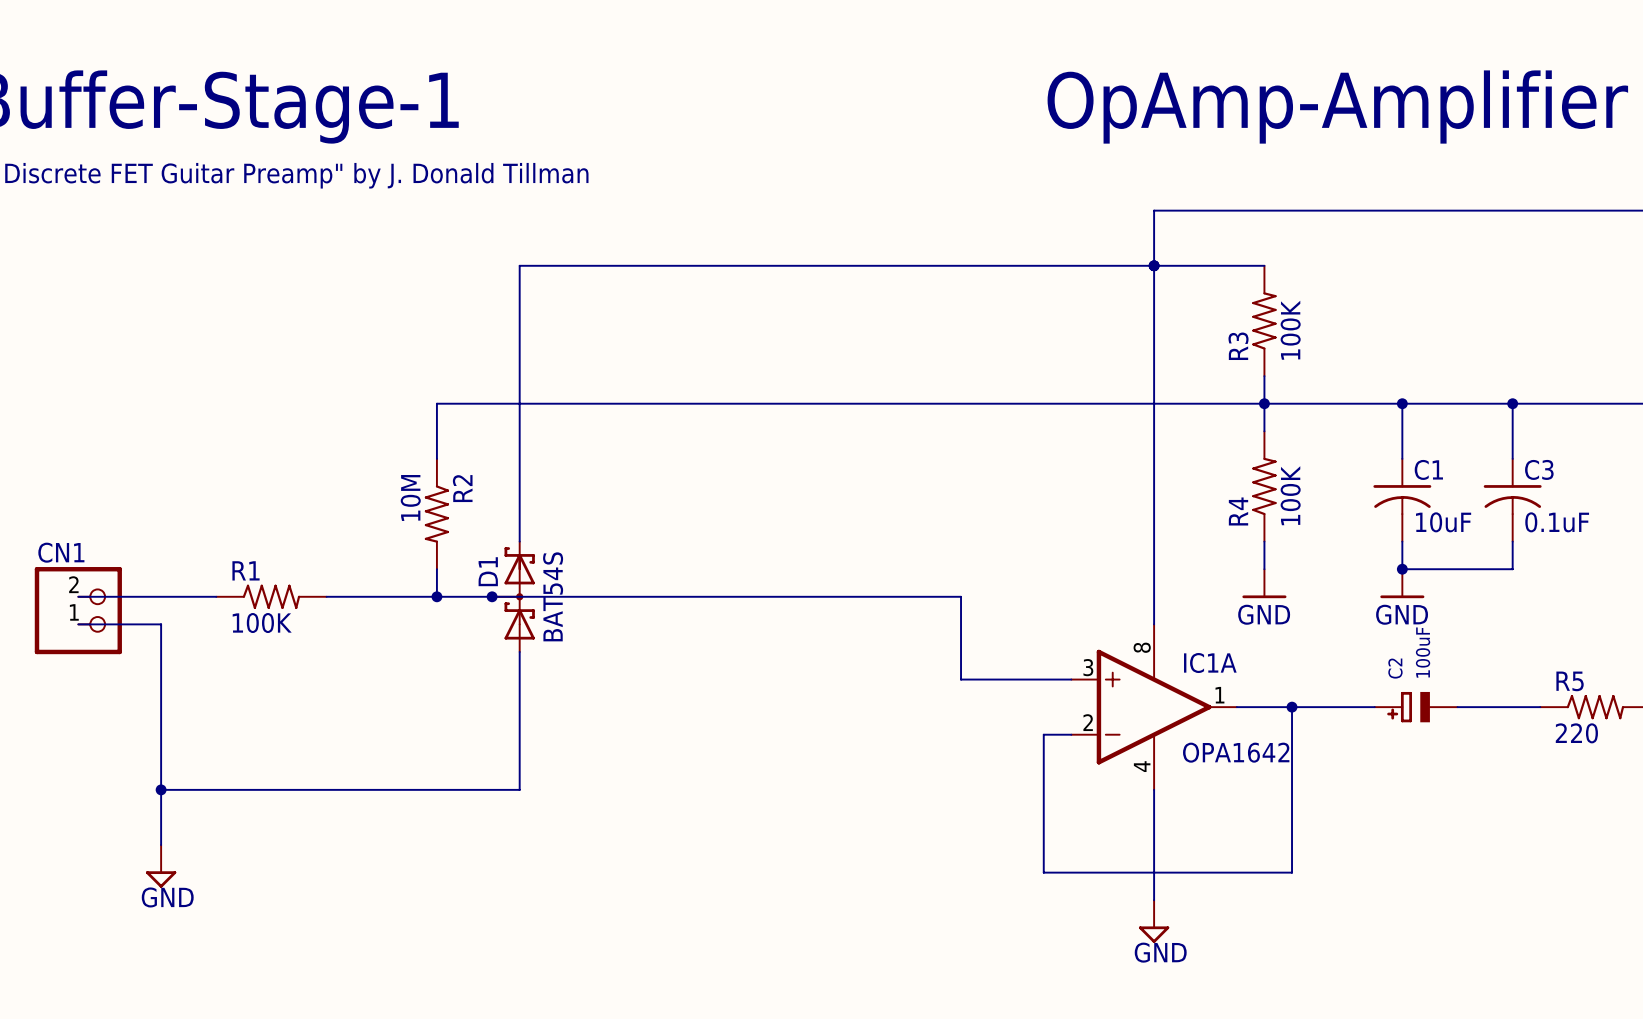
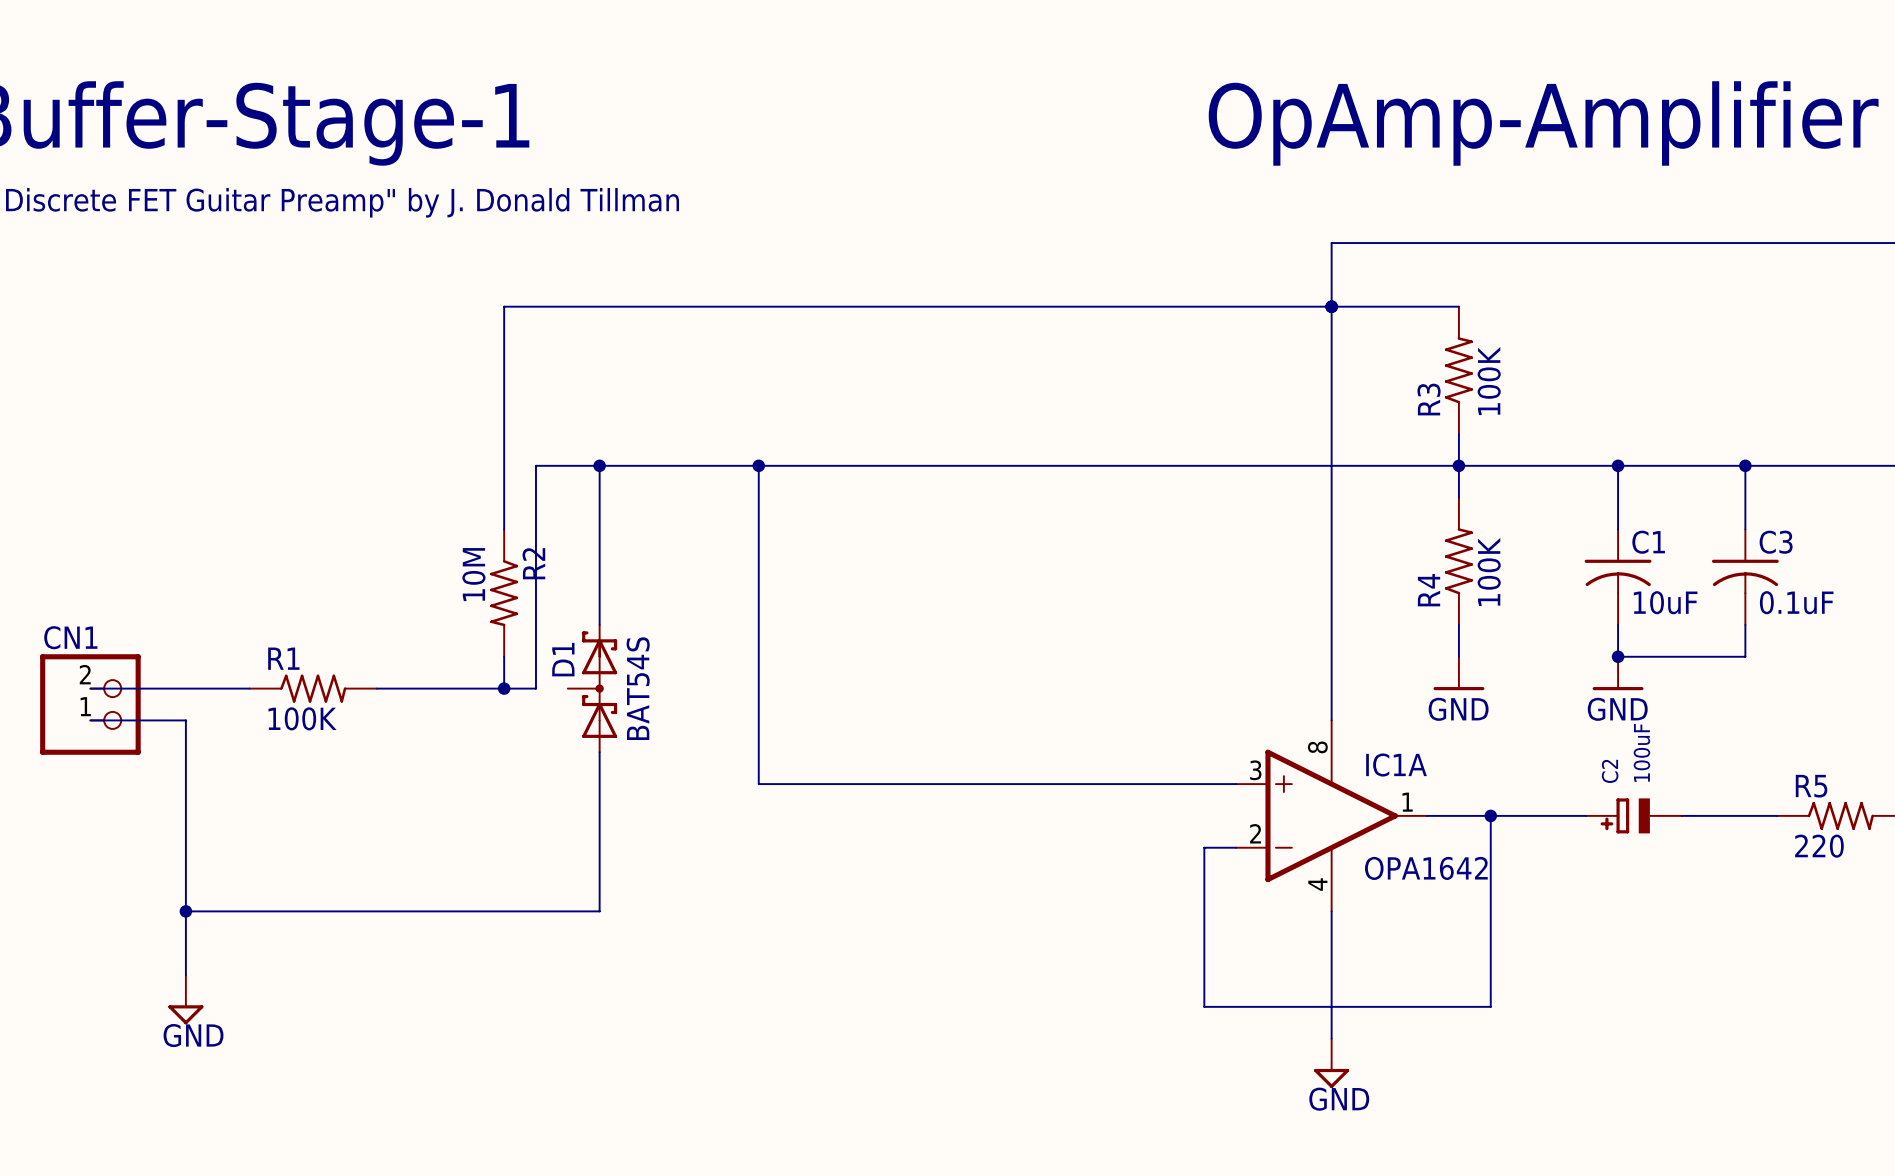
wire: (519, 265) (519, 403) -> (599, 306) (504, 306) (504, 465)
wire: (436, 403) (464, 403) -> (535, 688) (535, 465)
junction: none -> (599, 465)
junction: none -> (758, 465)
wire: (464, 596) (961, 596) (961, 679) -> (758, 465) (758, 784) (1108, 784)
junction: (492, 596) -> none

